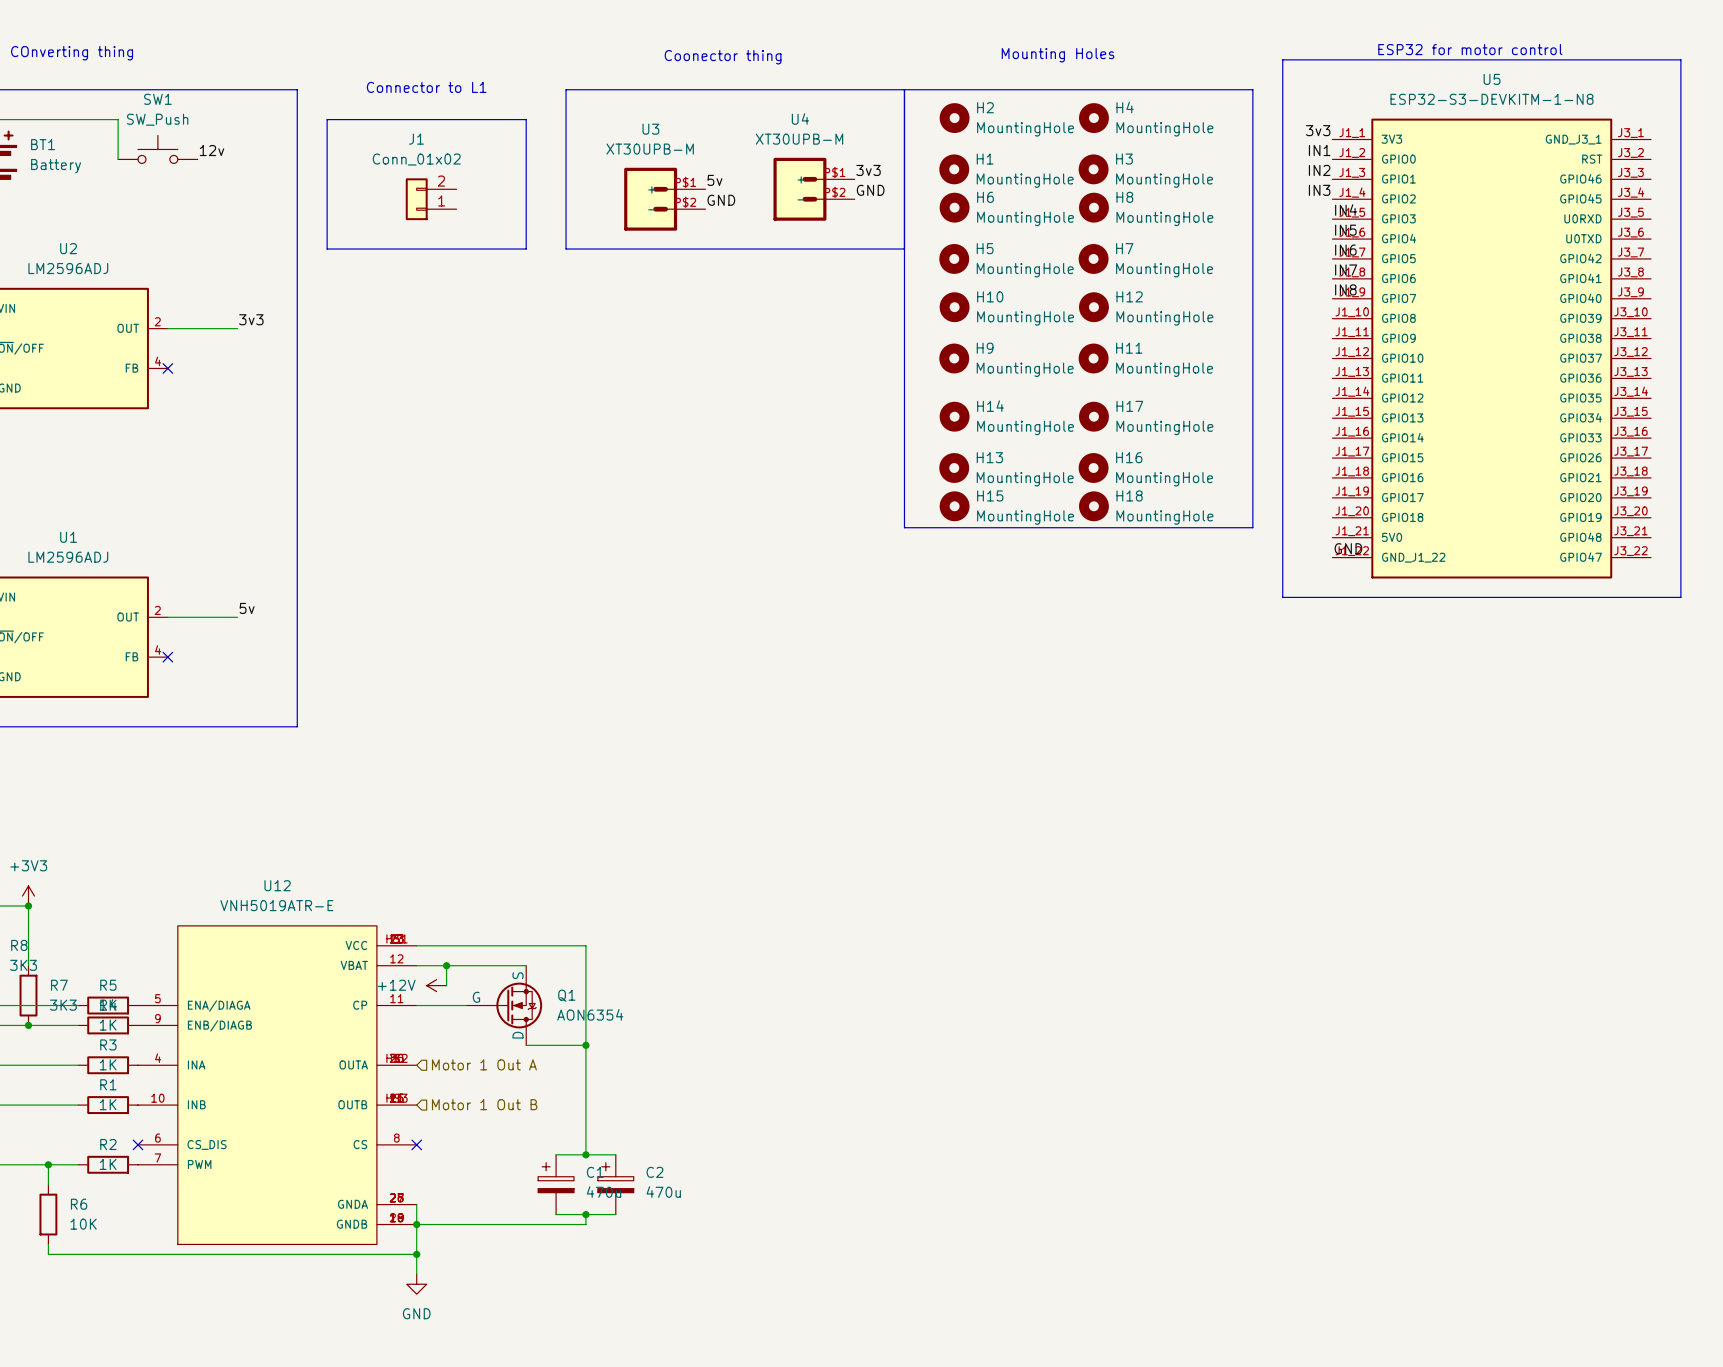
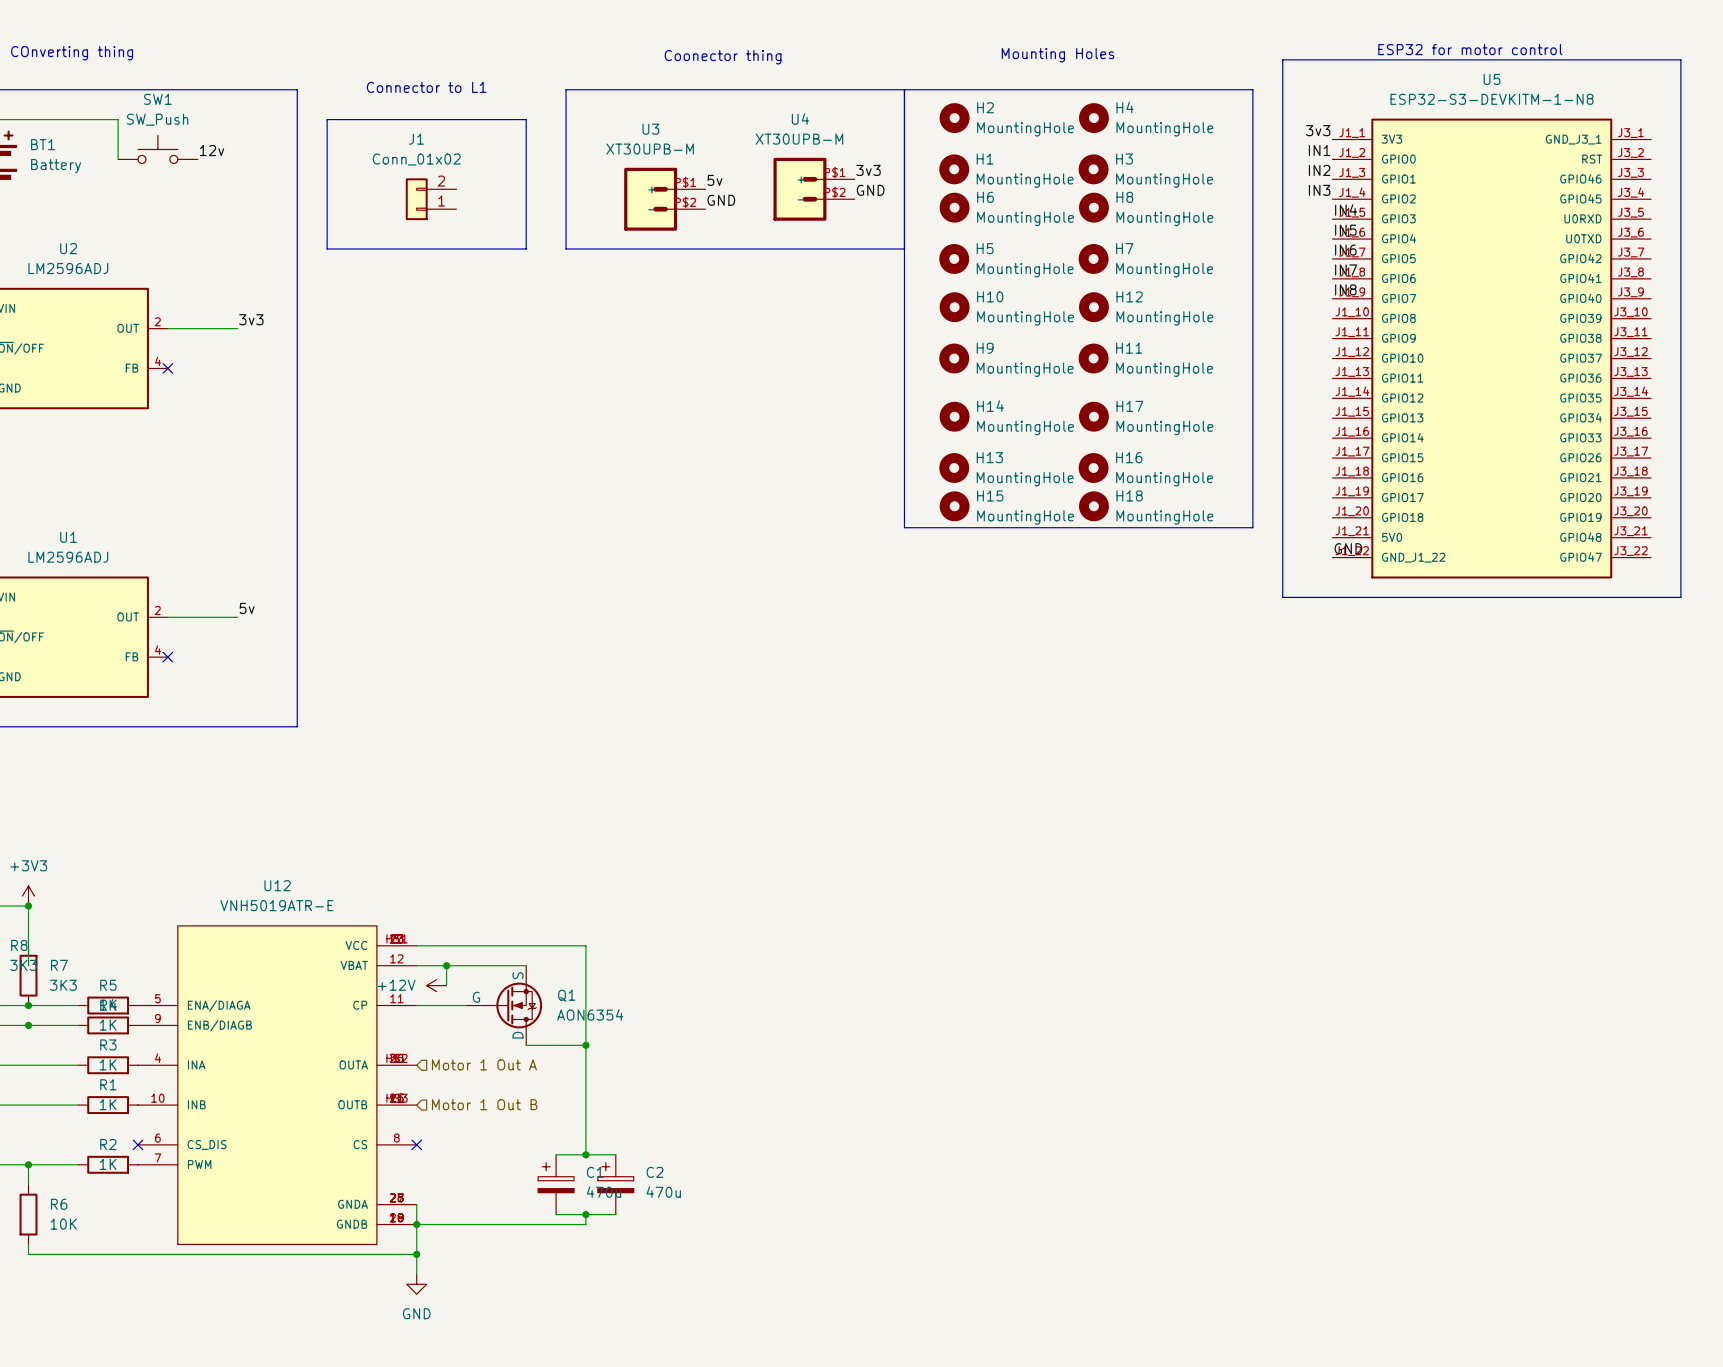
R7 position: (28, 995) -> (28, 975)
junction: none -> (28, 1005)
wire: (48, 1164) (48, 1184) -> (28, 1164) (28, 1184)
junction position: (48, 1164) -> (28, 1164)
R6 position: (48, 1214) -> (28, 1214)
wire: (48, 1244) (48, 1254) -> (28, 1244) (28, 1254) (48, 1254)

